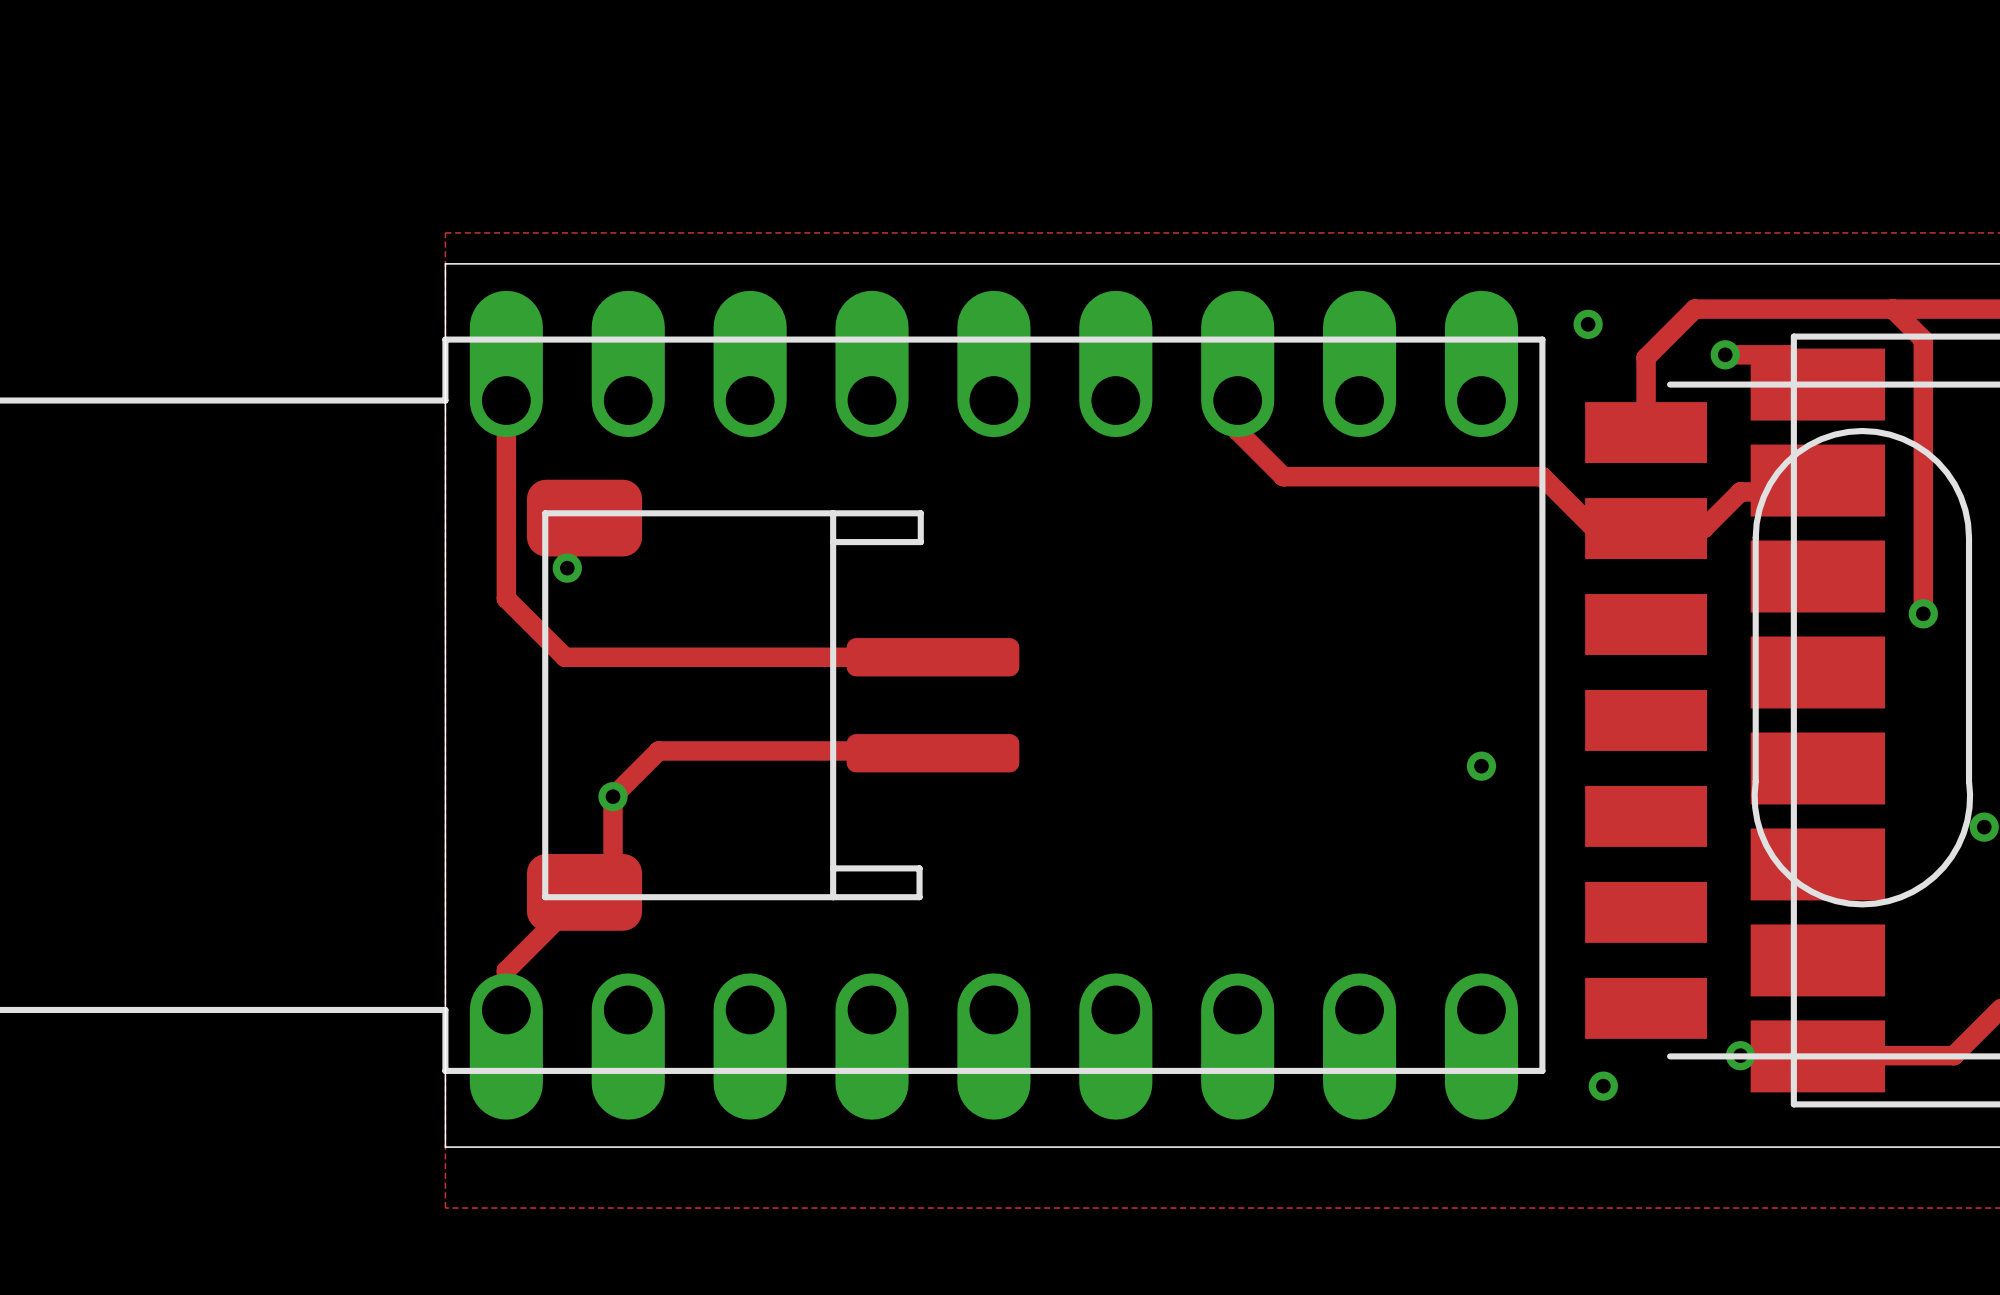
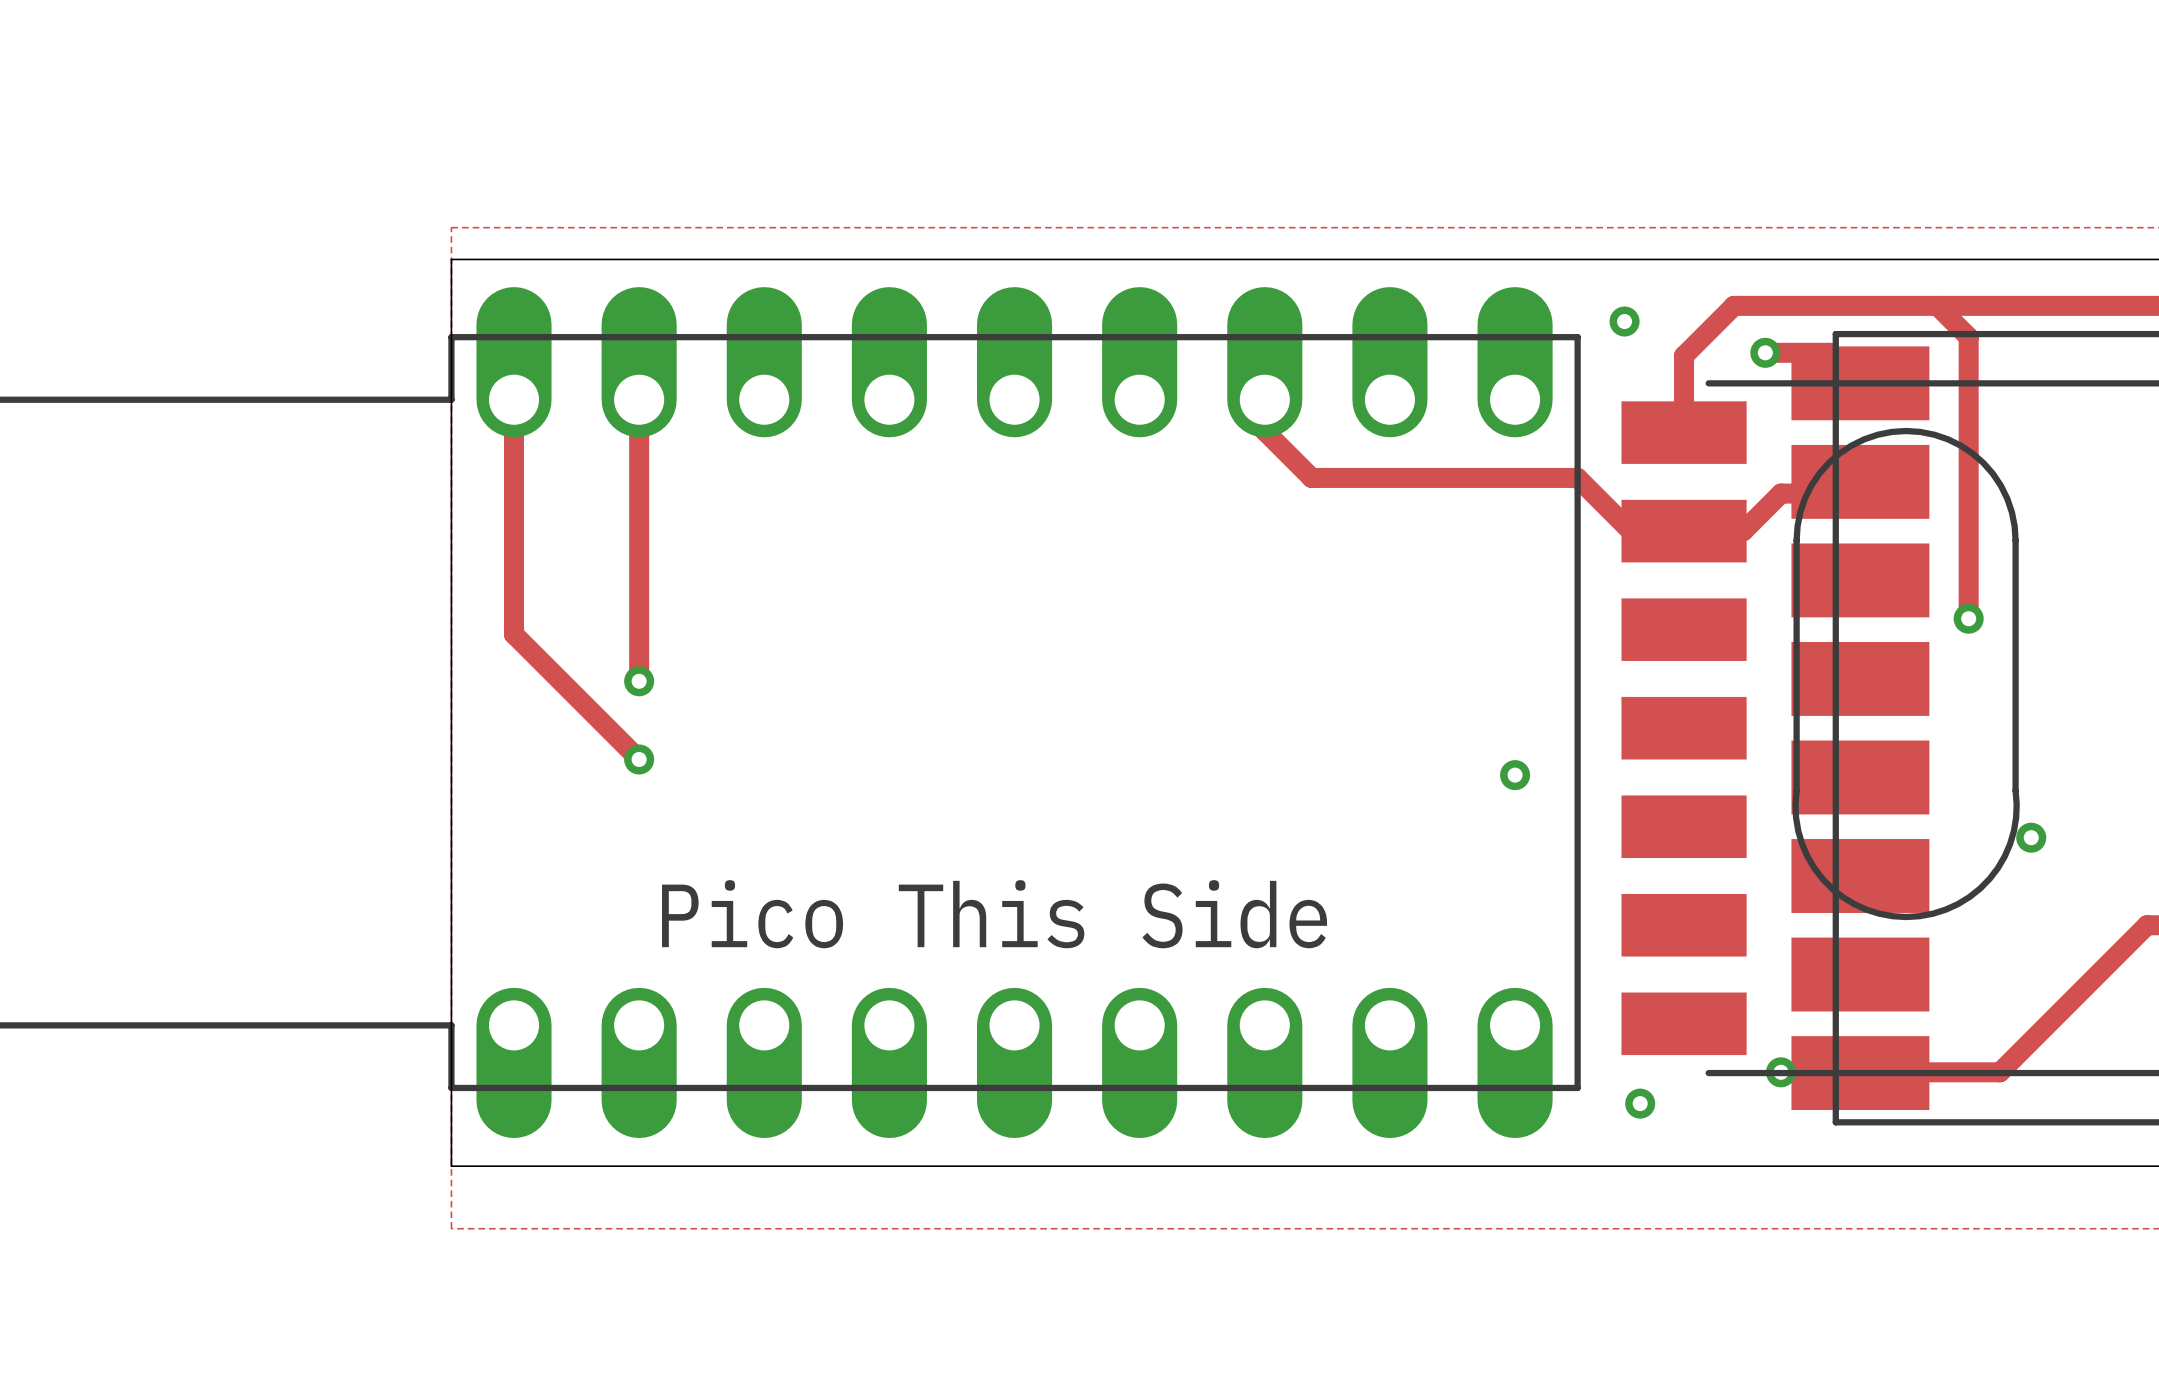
track: none -> (639, 399) (639, 681)
via: (567, 568) -> none
track: (506, 598) (565, 657) (932, 657) -> (514, 603) (514, 634) (639, 759)
via: none -> (639, 681)
part: (773, 705) -> none
track: (932, 753) (930, 750) (658, 750) (613, 796) (613, 863) (506, 970) (506, 1009) -> none
via position: (613, 796) -> (639, 759)
text: none -> Pico This Side (994, 914)

